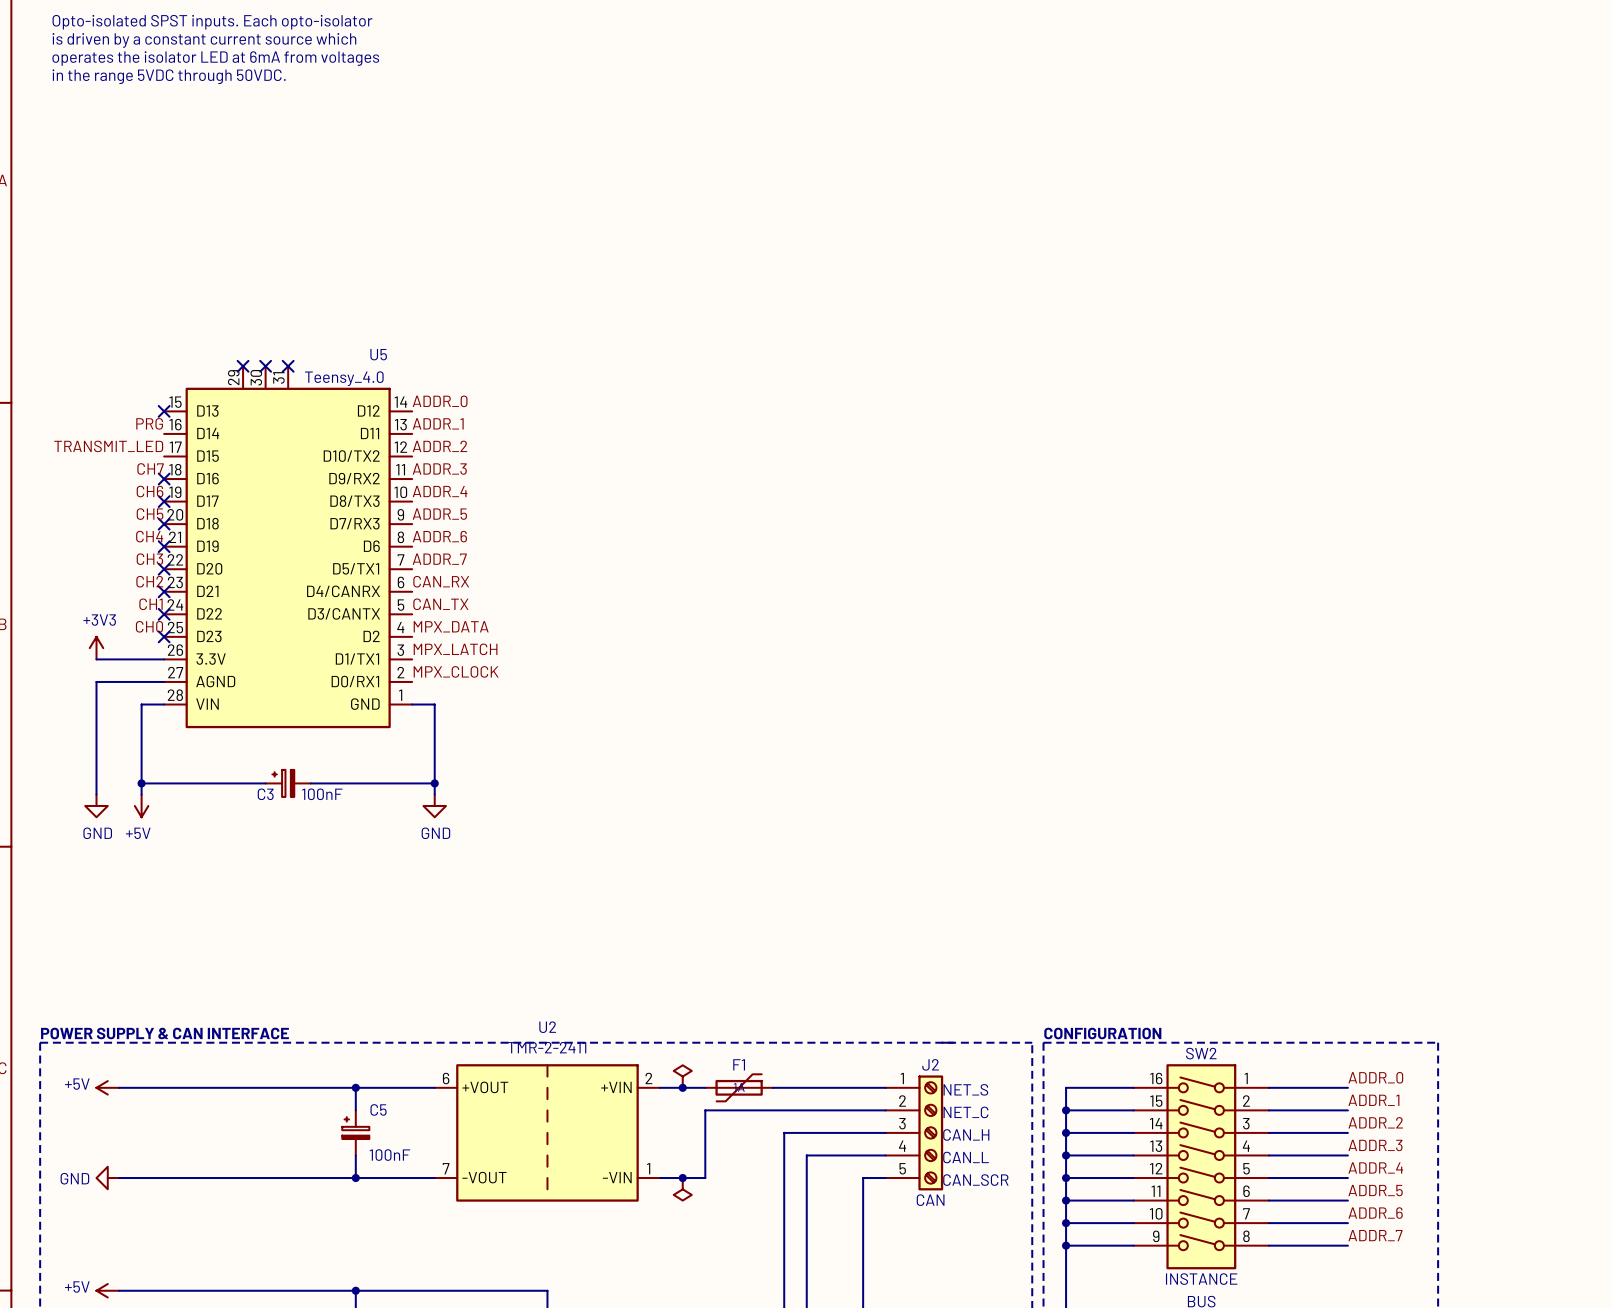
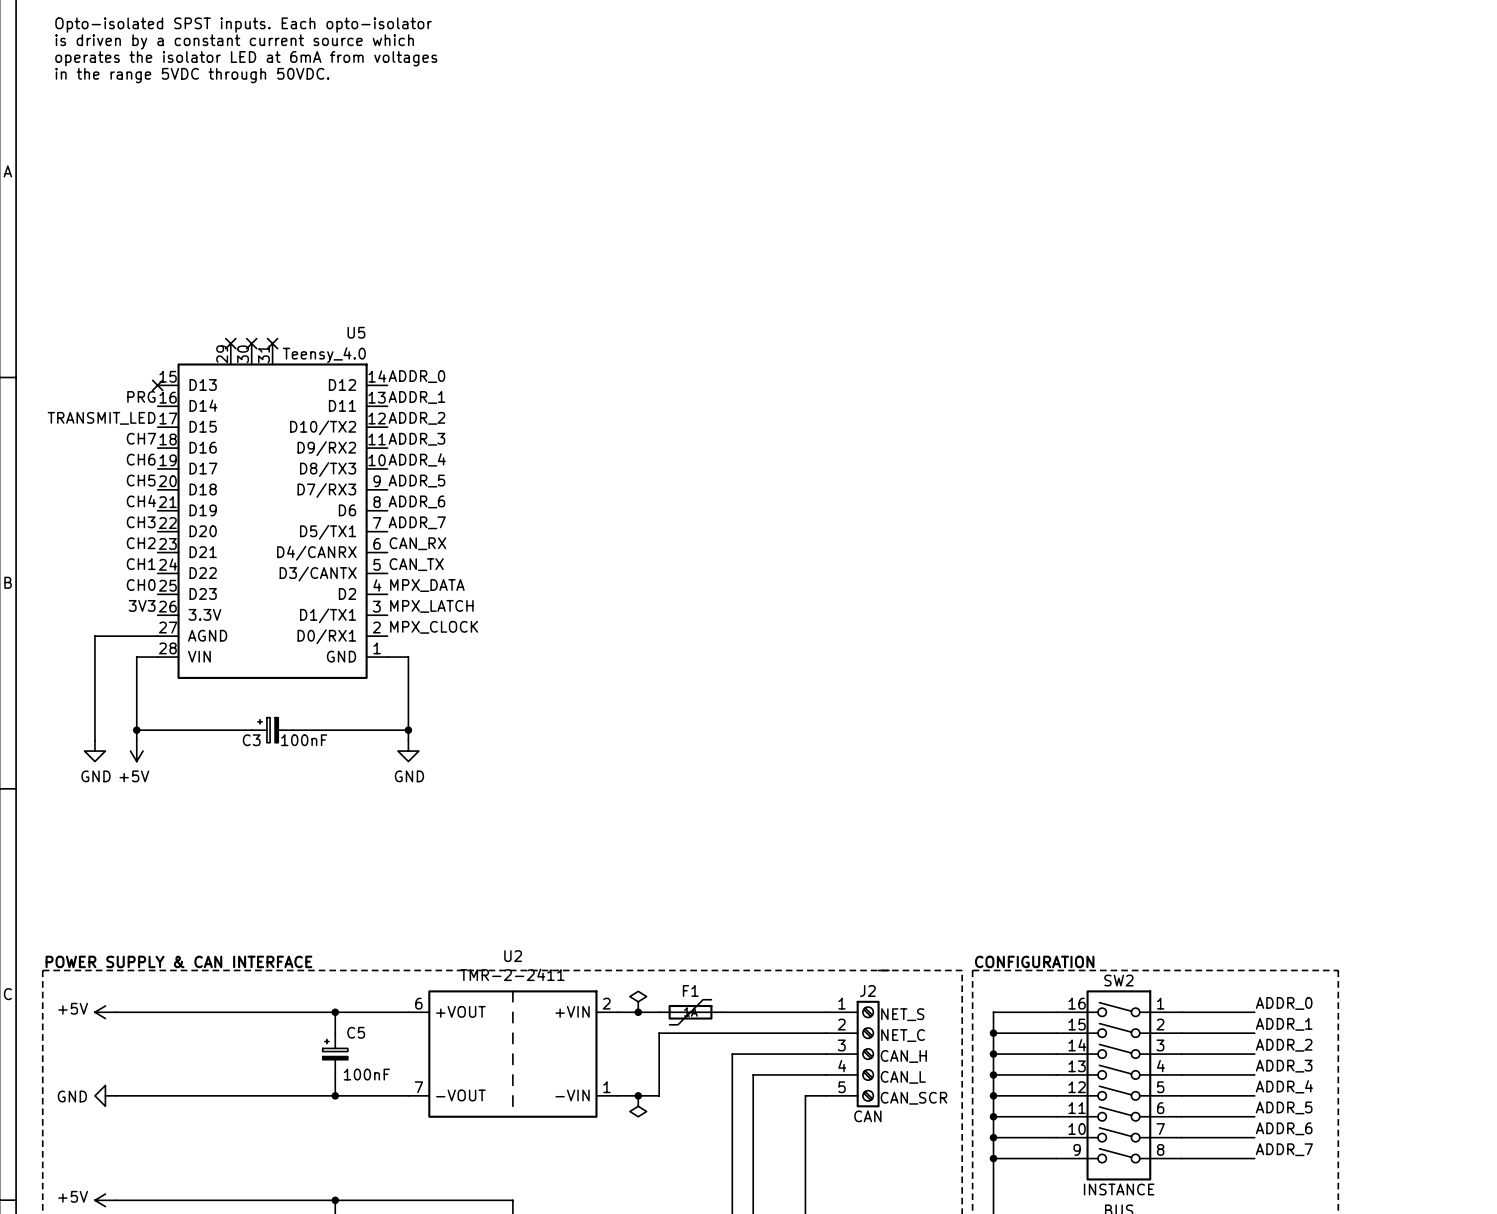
no-connect mark: (164, 479) -> none
no-connect mark: (164, 501) -> none
no-connect mark: (164, 524) -> none
no-connect mark: (164, 546) -> none
no-connect mark: (164, 569) -> none
no-connect mark: (164, 591) -> none
no-connect mark: (164, 614) -> none
no-connect mark: (164, 636) -> none
power symbol: +3V3 (96, 648) -> none
label: none -> 3V3 (142, 605)
wire: (96, 659) (164, 659) -> none

